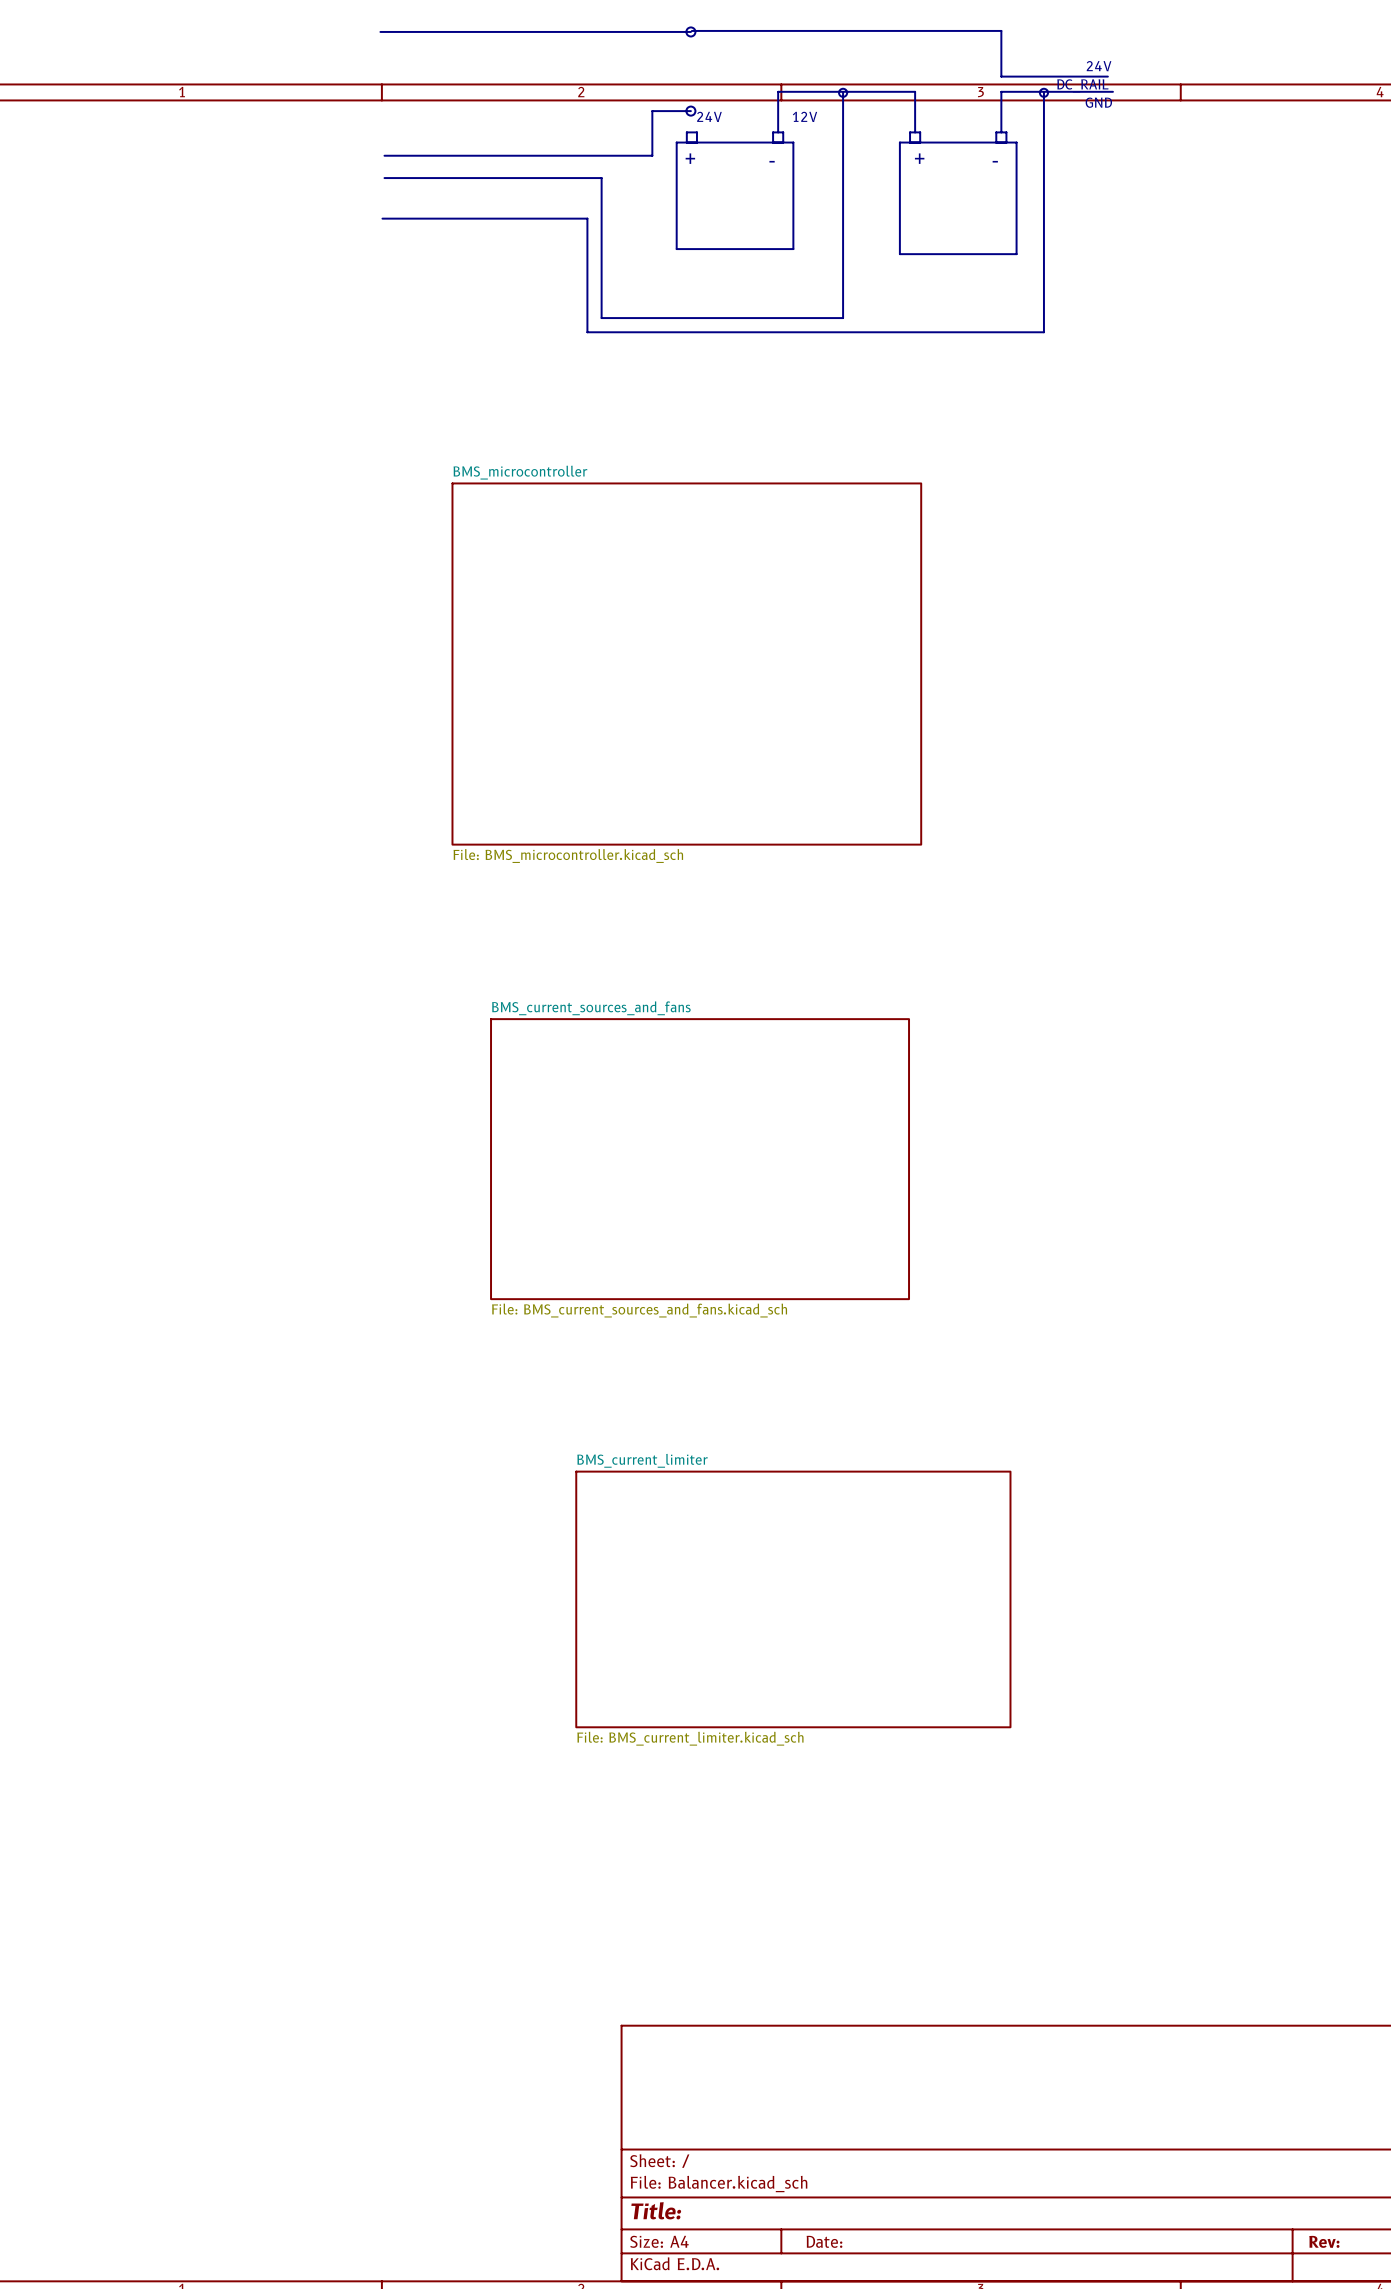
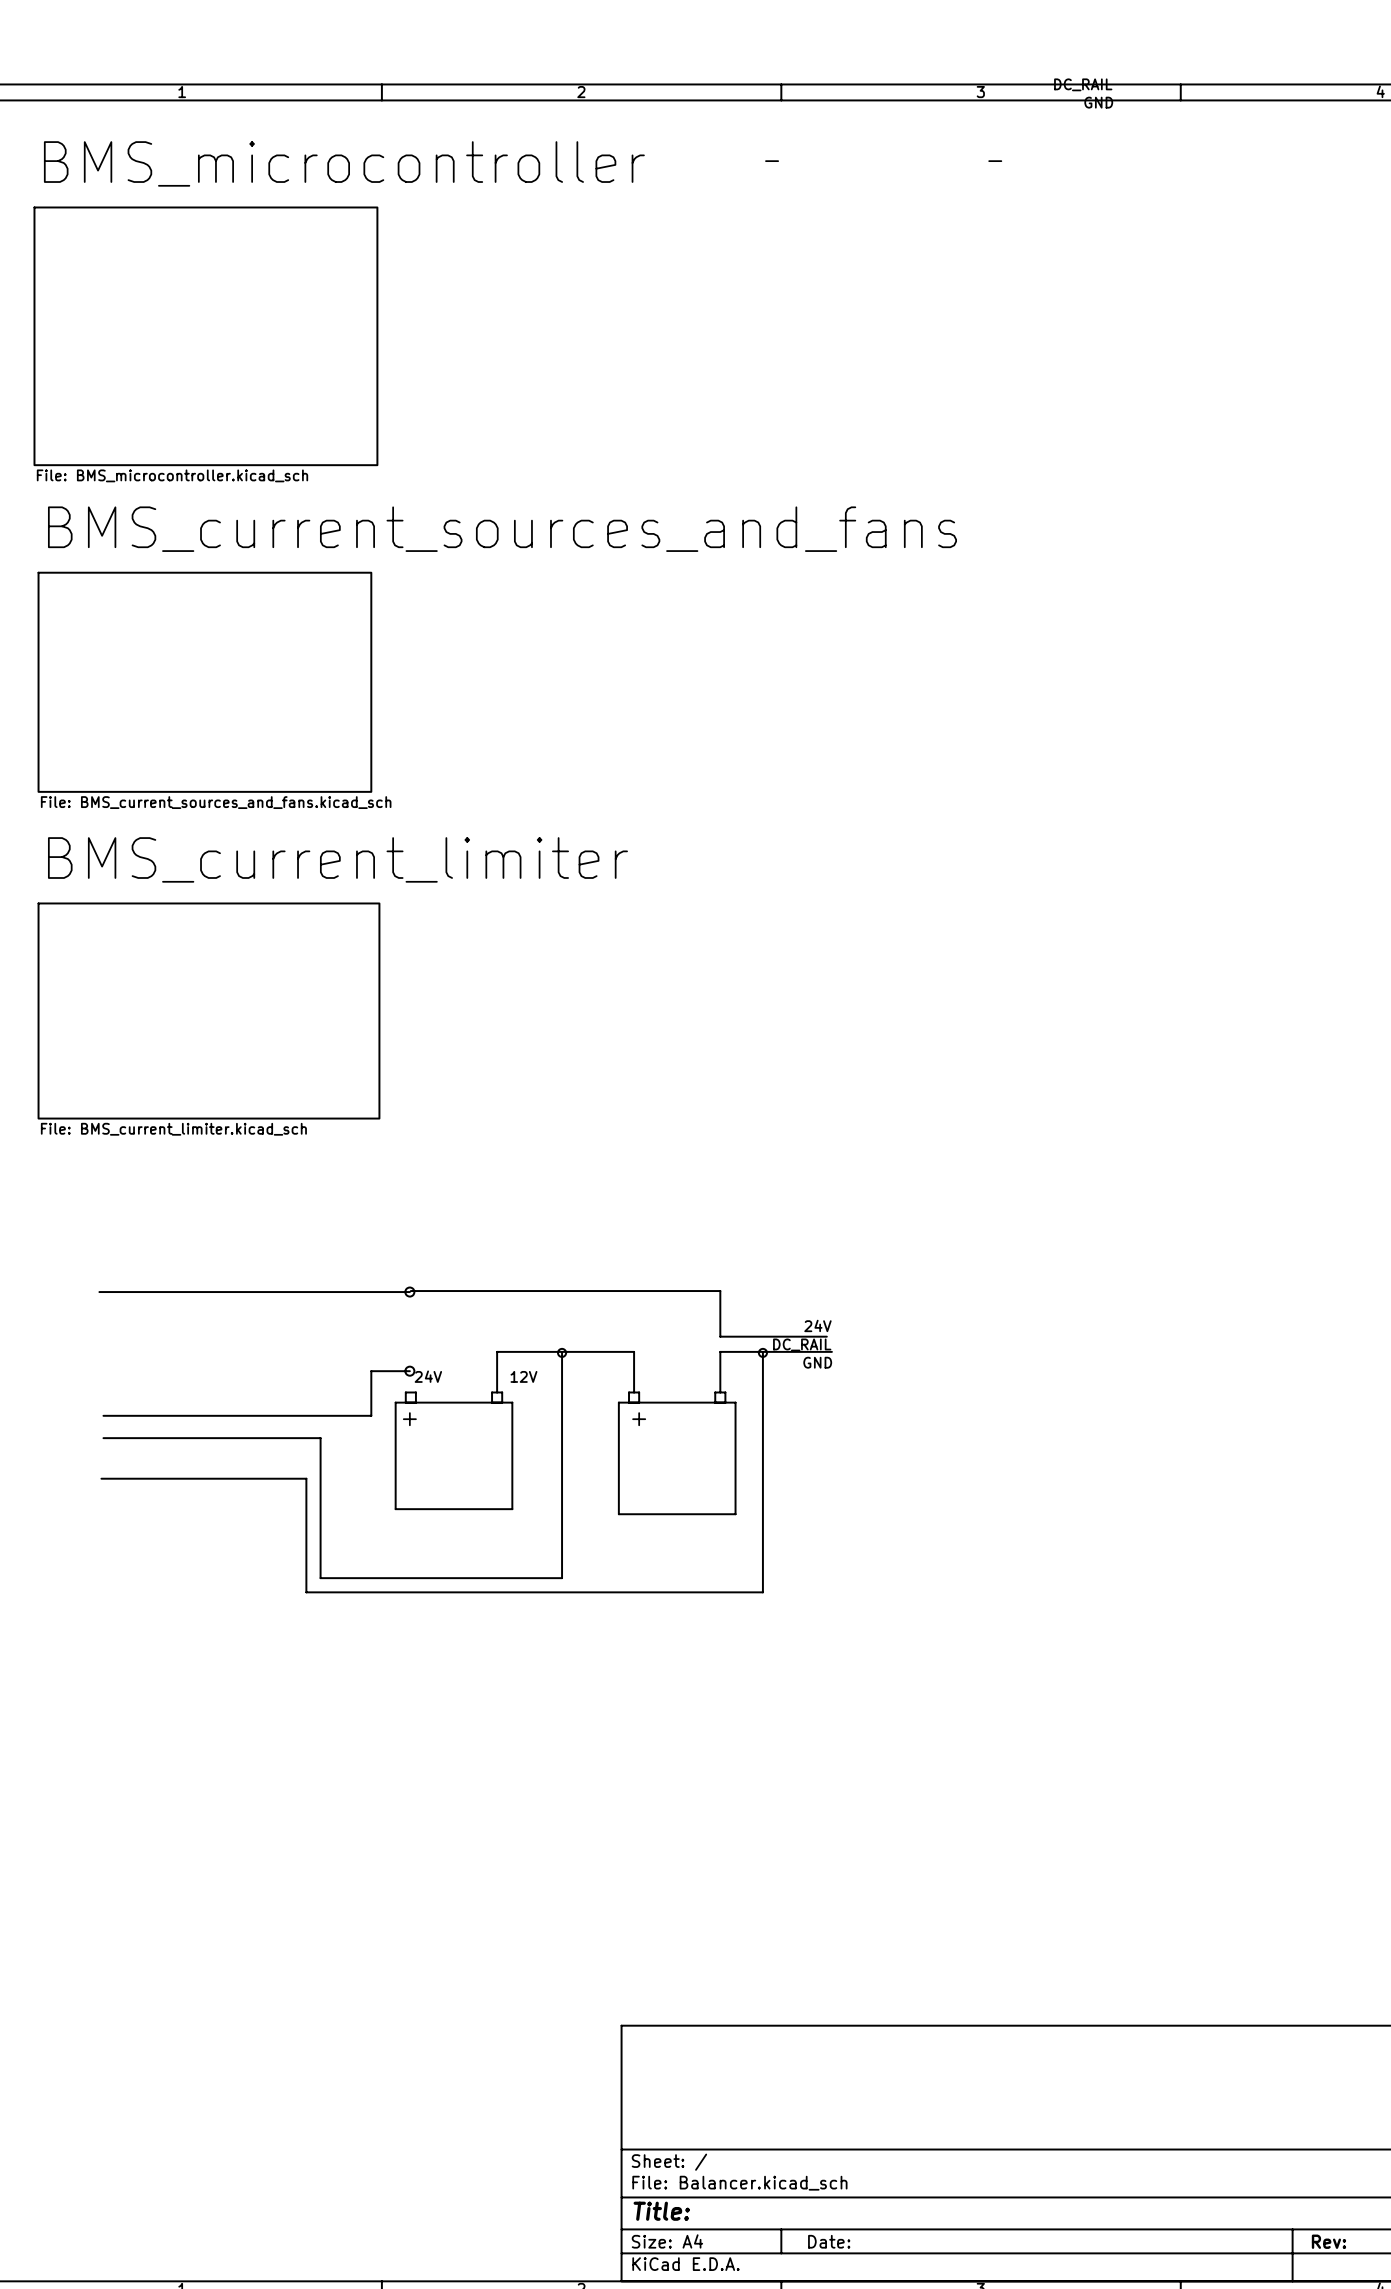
drawing: [686, 27, 696, 37] -> none
line: (691, 30) (1001, 30) (1001, 76) (1107, 76) -> none
line: (380, 31) (690, 31) -> none
text: 24V (1099, 66) -> none
drawing: [839, 88, 848, 97] -> none
drawing: [1039, 88, 1049, 97] -> none
line: (1112, 91) (1001, 91) (1001, 132) -> none
line: (843, 92) (843, 318) (601, 318) (601, 178) (384, 178) -> none
line: (1043, 92) (1043, 332) (587, 332) (587, 218) (382, 218) -> none
drawing: [686, 106, 696, 116] -> none
line: (690, 111) (652, 111) (652, 155) (384, 155) -> none
text: 24V (709, 116) -> none
text: 12V (804, 116) -> none
line: (778, 132) (778, 91) (915, 91) (915, 132) -> none
line: (676, 142) (793, 142) (793, 249) (676, 249) (676, 142) -> none
line: (686, 142) (686, 132) (696, 132) (696, 142) -> none
line: (773, 142) (773, 132) (783, 132) (783, 142) -> none
line: (899, 142) (1016, 142) (1016, 254) (899, 254) (899, 142) -> none
line: (910, 142) (910, 132) (920, 132) (920, 142) -> none
line: (996, 142) (996, 132) (1006, 132) (1006, 142) -> none
text: + (690, 158) -> none
text: + (919, 158) -> none
sheet BMS_microcontroller: none -> File: BMS_microcontroller.kicad_sch (205, 336)
sheet BMS_microcontroller: File: BMS_microcontroller.kicad_sch (686, 664) -> none
sheet BMS_current_sources_and_fans: none -> File: BMS_current_sources_and_fans.kicad_sch (204, 682)
sheet BMS_current_limiter: none -> File: BMS_current_limiter.kicad_sch (208, 1011)
sheet BMS_current_sources_and_fans: File: BMS_current_sources_and_fans.kicad_sch (700, 1159) -> none
drawing: none -> [405, 1287, 415, 1297]
line: none -> (410, 1291) (720, 1291) (720, 1336) (826, 1336)
line: none -> (99, 1292) (409, 1292)
text: none -> 24V (817, 1325)
text: none -> DC_RAIL (802, 1344)
drawing: none -> [557, 1348, 567, 1357]
drawing: none -> [758, 1348, 767, 1357]
line: none -> (831, 1351) (720, 1351) (720, 1392)
line: none -> (562, 1352) (562, 1578) (320, 1578) (320, 1438) (103, 1438)
line: none -> (762, 1352) (762, 1592) (306, 1592) (306, 1478) (101, 1478)
text: none -> GND (817, 1362)
drawing: none -> [405, 1366, 415, 1376]
line: none -> (409, 1371) (371, 1371) (371, 1415) (103, 1415)
text: none -> 24V (428, 1376)
text: none -> 12V (523, 1376)
line: none -> (497, 1392) (497, 1351) (634, 1351) (634, 1392)
line: none -> (395, 1402) (512, 1402) (512, 1509) (395, 1509) (395, 1402)
line: none -> (405, 1402) (405, 1392) (415, 1392) (415, 1402)
line: none -> (492, 1402) (492, 1392) (502, 1392) (502, 1402)
line: none -> (618, 1402) (735, 1402) (735, 1514) (618, 1514) (618, 1402)
line: none -> (629, 1402) (629, 1392) (639, 1392) (639, 1402)
line: none -> (715, 1402) (715, 1392) (725, 1392) (725, 1402)
text: none -> + (409, 1419)
text: none -> + (639, 1419)
sheet BMS_current_limiter: File: BMS_current_limiter.kicad_sch (793, 1599) -> none

